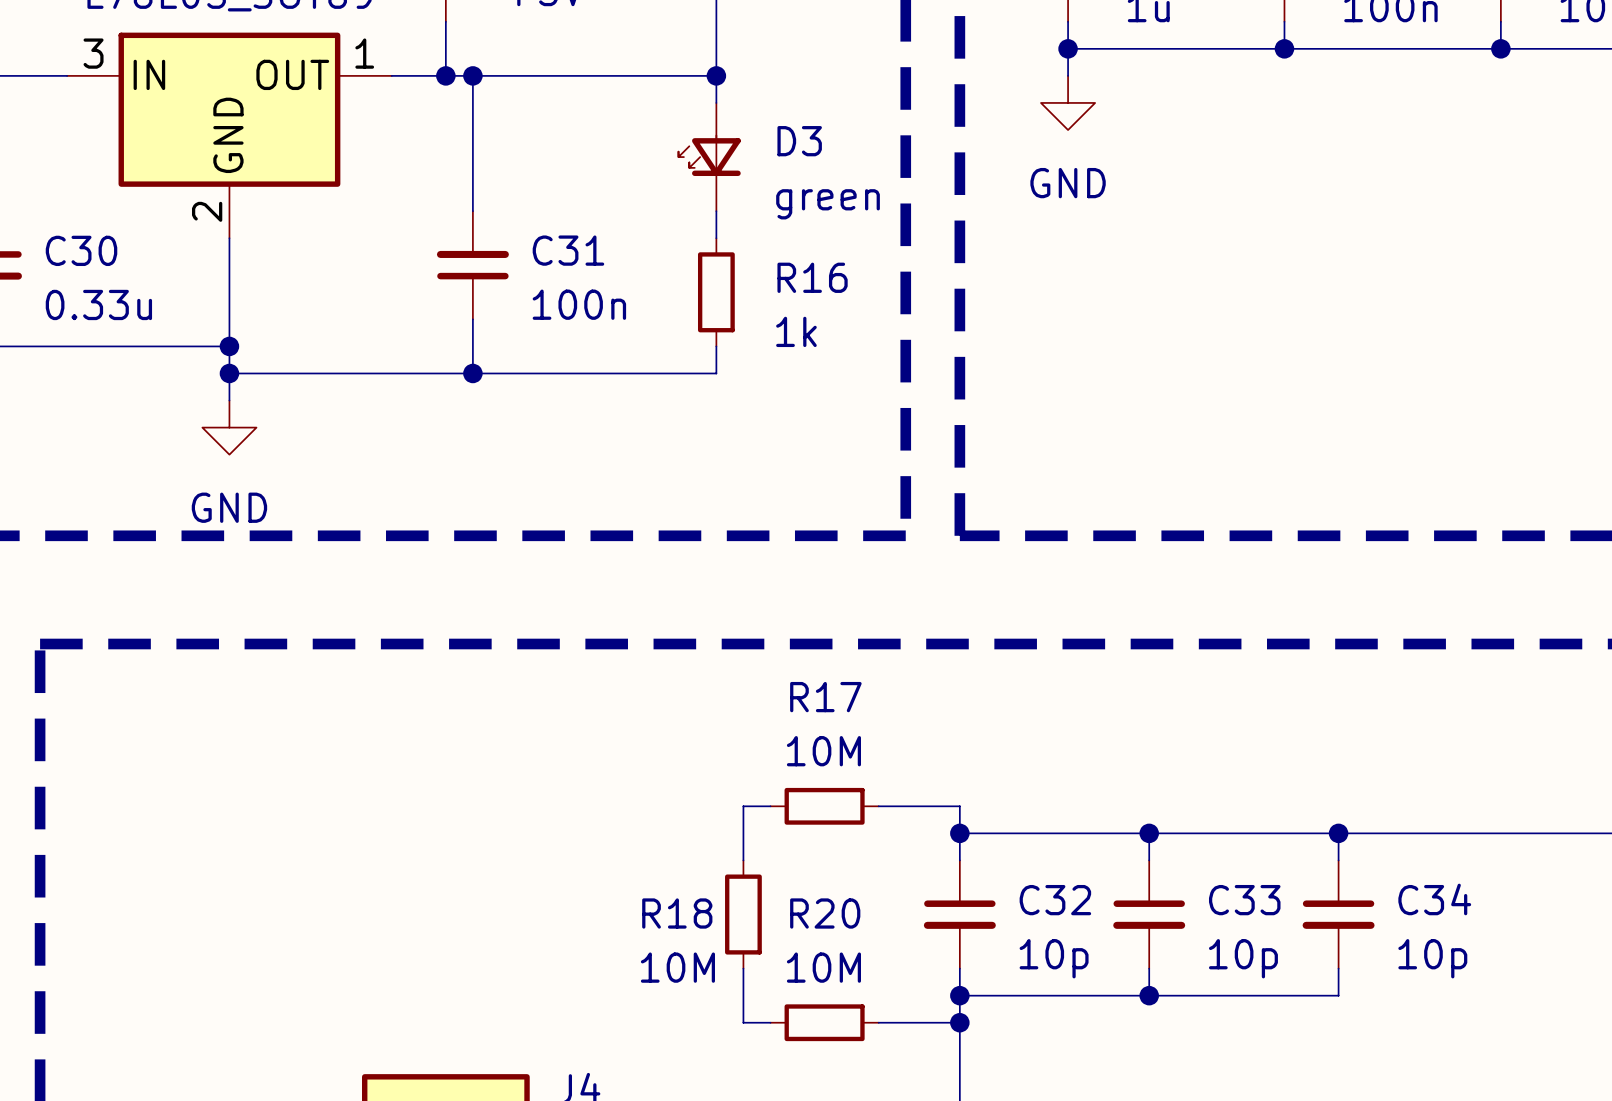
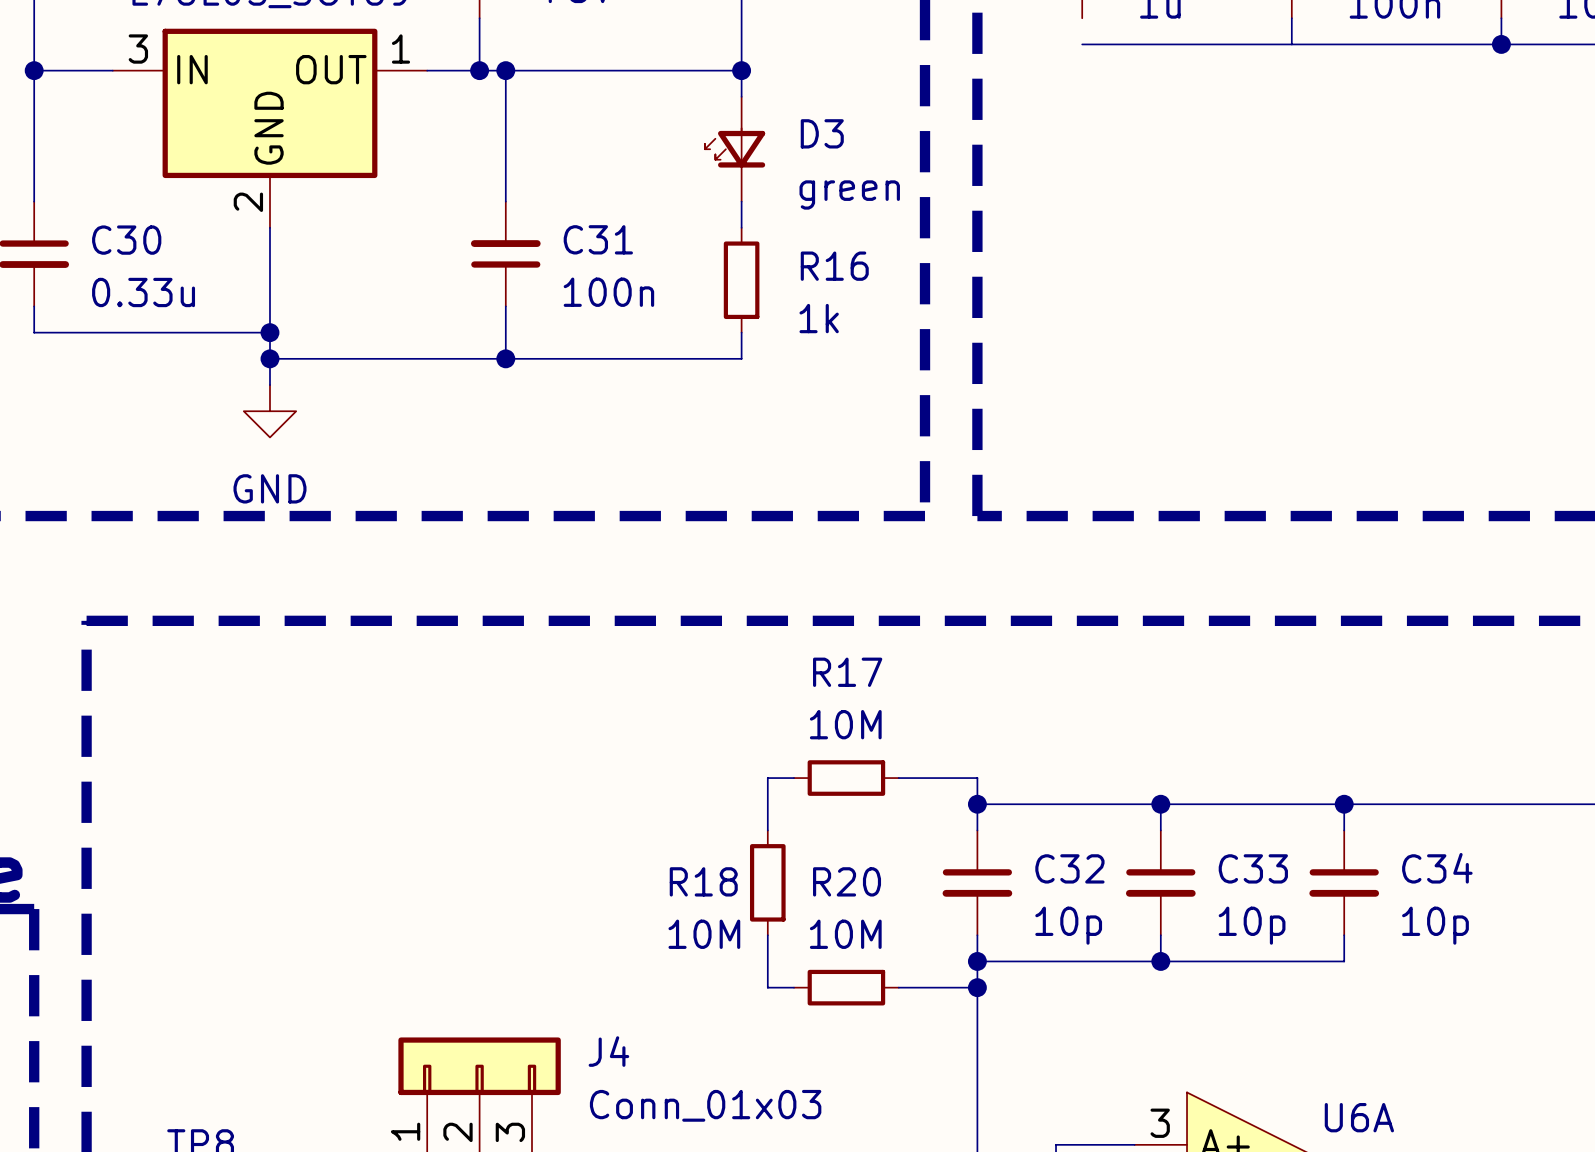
wire: (1068, 21) (1068, 75) -> none
junction: (1068, 48) -> none
junction: (1284, 48) -> none
power symbol: GND (1068, 102) -> none

